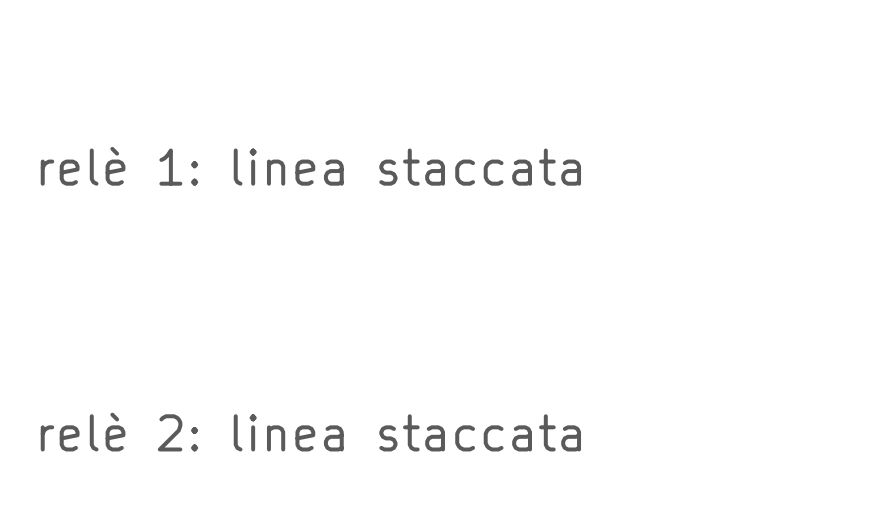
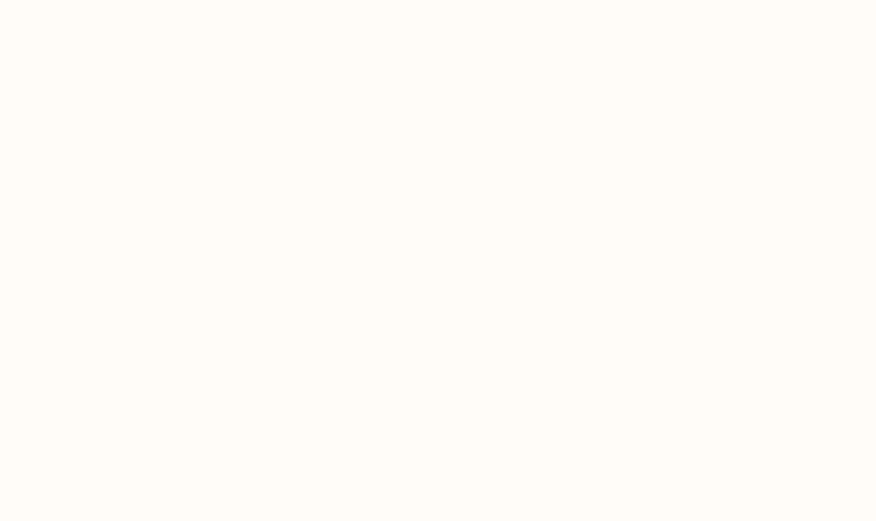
text: relè 1: linea staccata (310, 166) -> none
text: relè 2: linea staccata (310, 432) -> none

